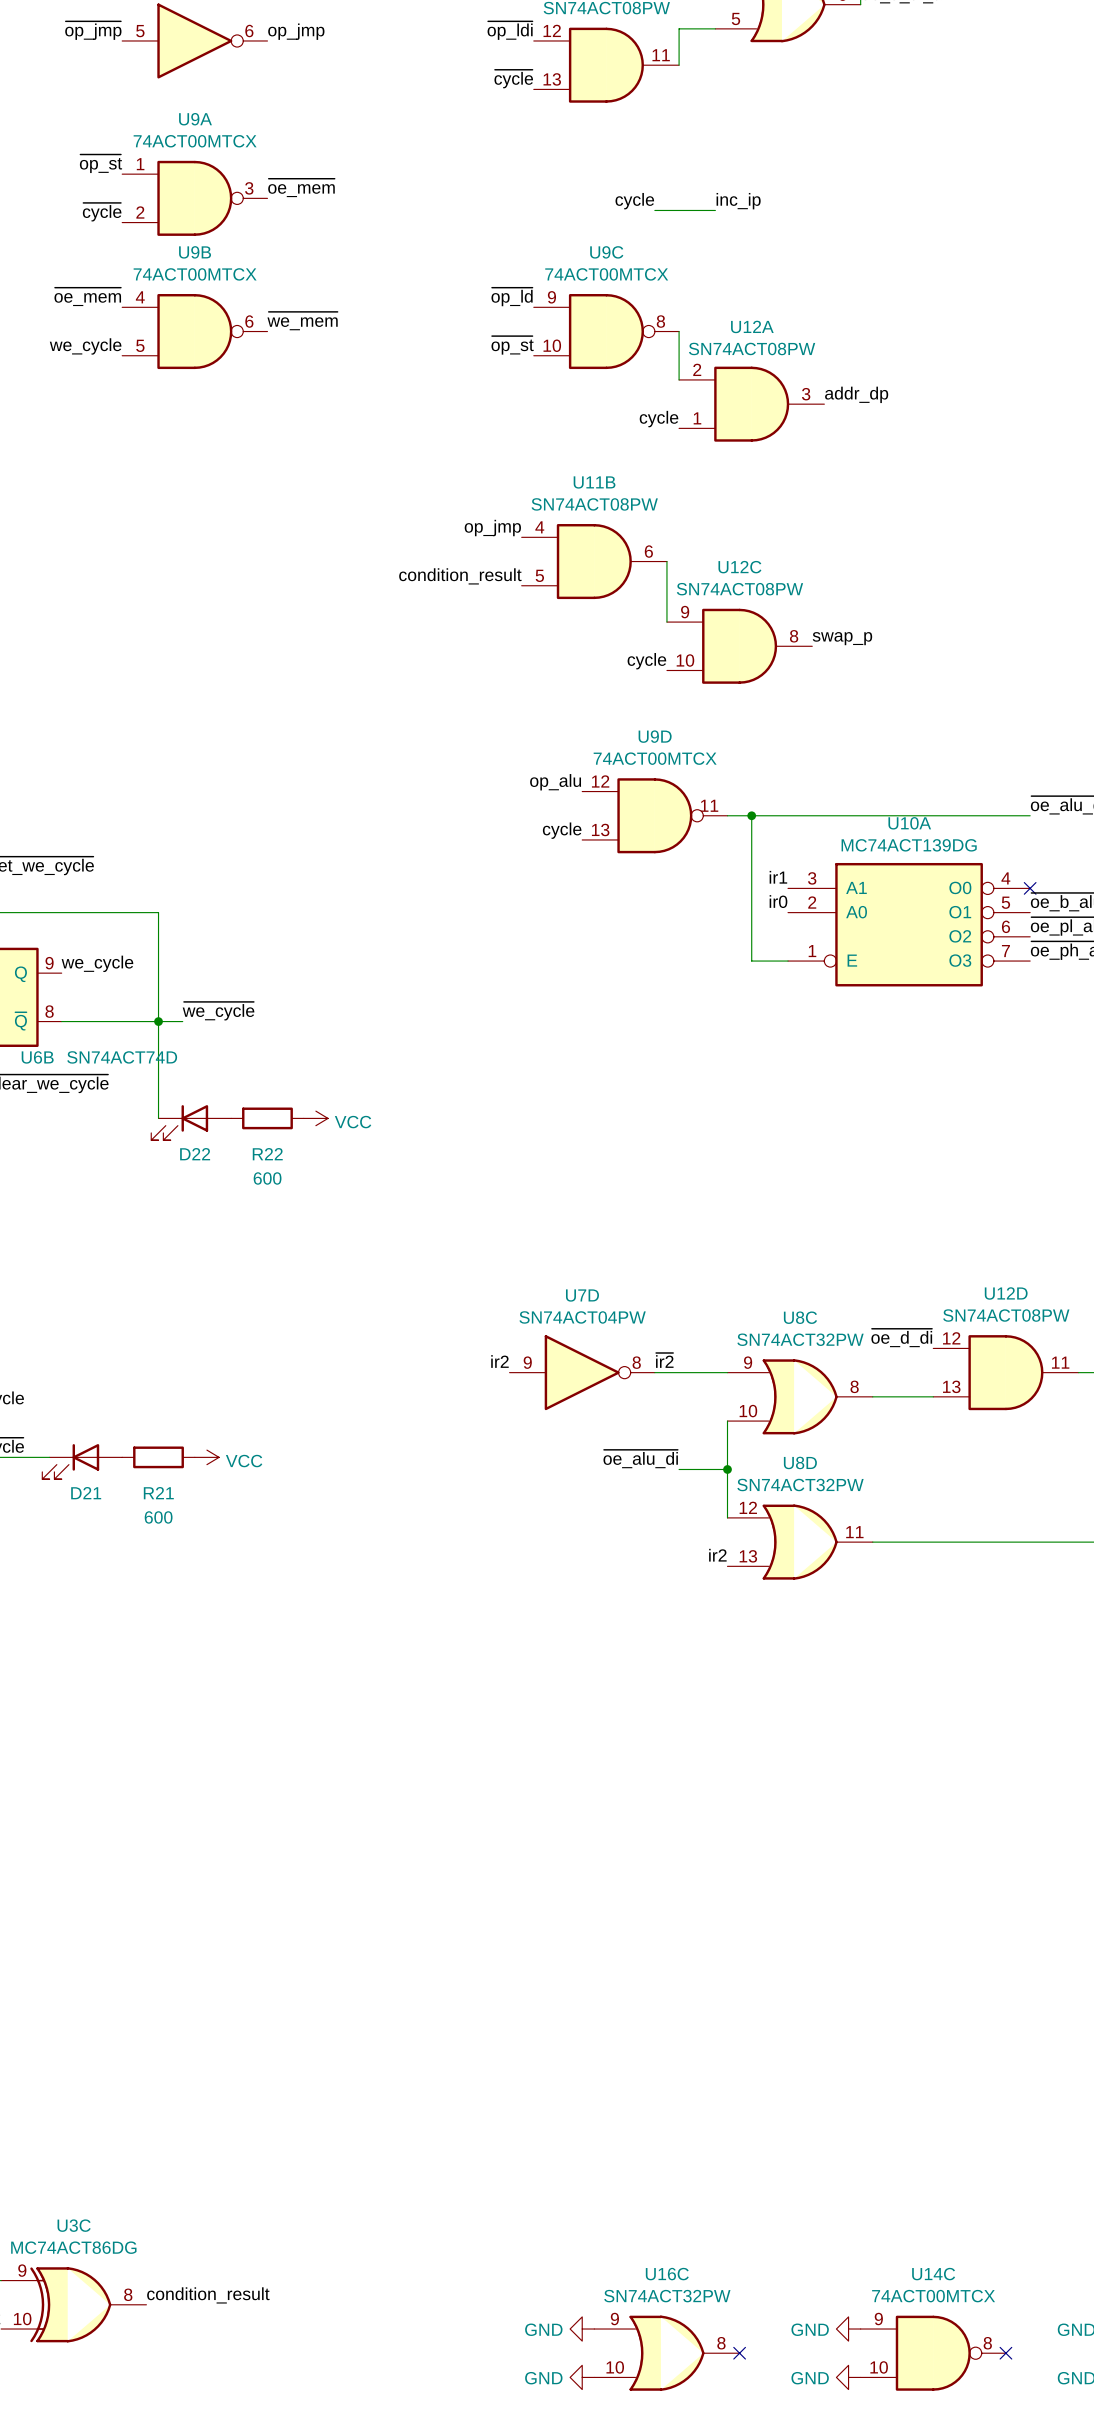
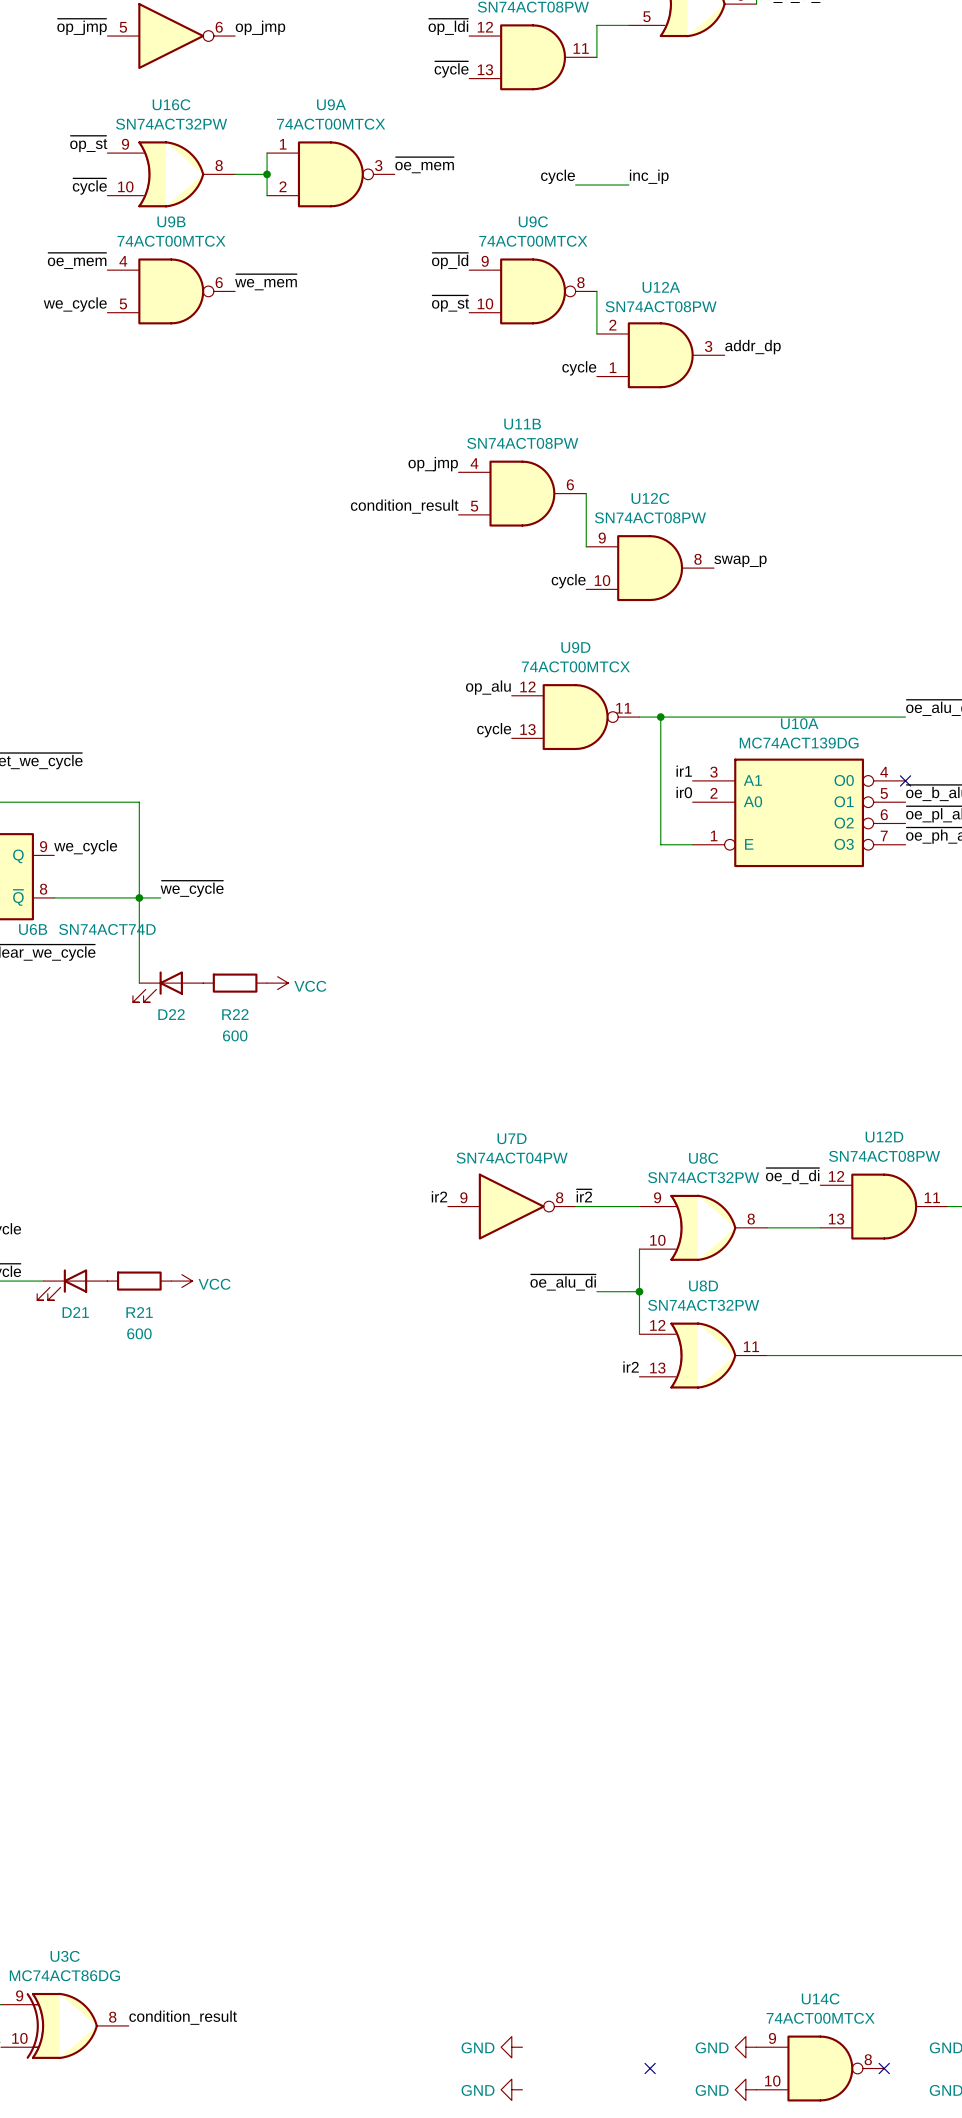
wire: none -> (267, 153) (267, 195)
label position: ~{oe_mem} (301, 187) -> ~{oe_mem} (424, 165)
U9A position: (194, 198) -> (330, 174)
wire: none -> (235, 174) (267, 174)
junction: none -> (267, 174)
U16C position: (666, 2353) -> (171, 174)

